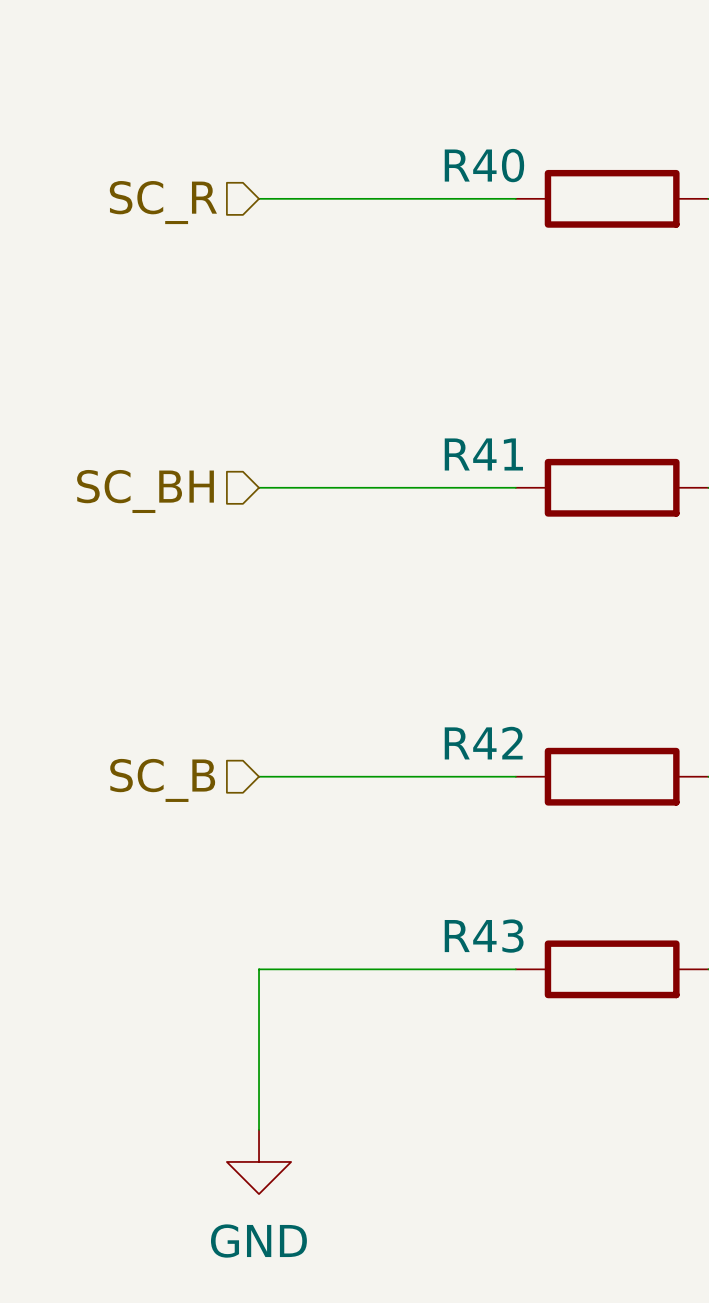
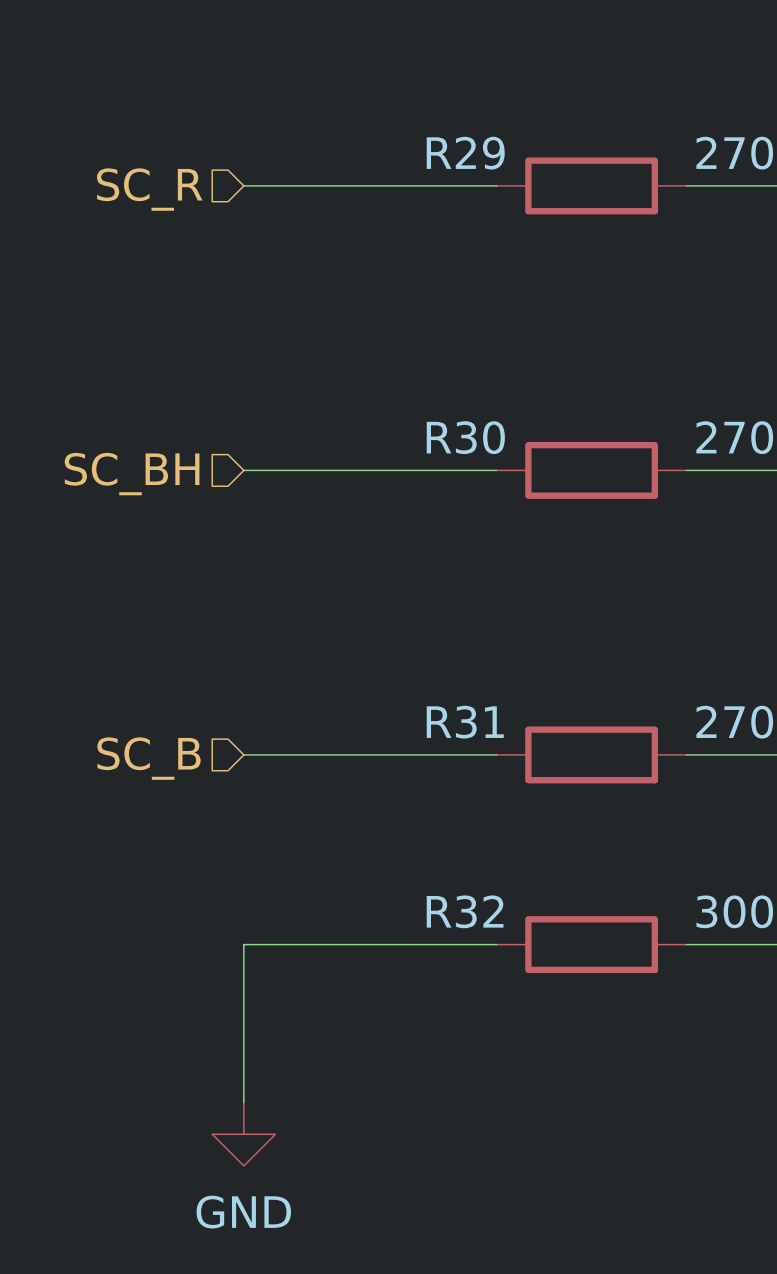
R40 name: R40 (484, 165) -> R29 (465, 153)
R41 name: R41 (483, 454) -> R30 (465, 437)
R42 name: R42 (483, 743) -> R31 (465, 722)
R43 name: R43 (484, 936) -> R32 (465, 911)

